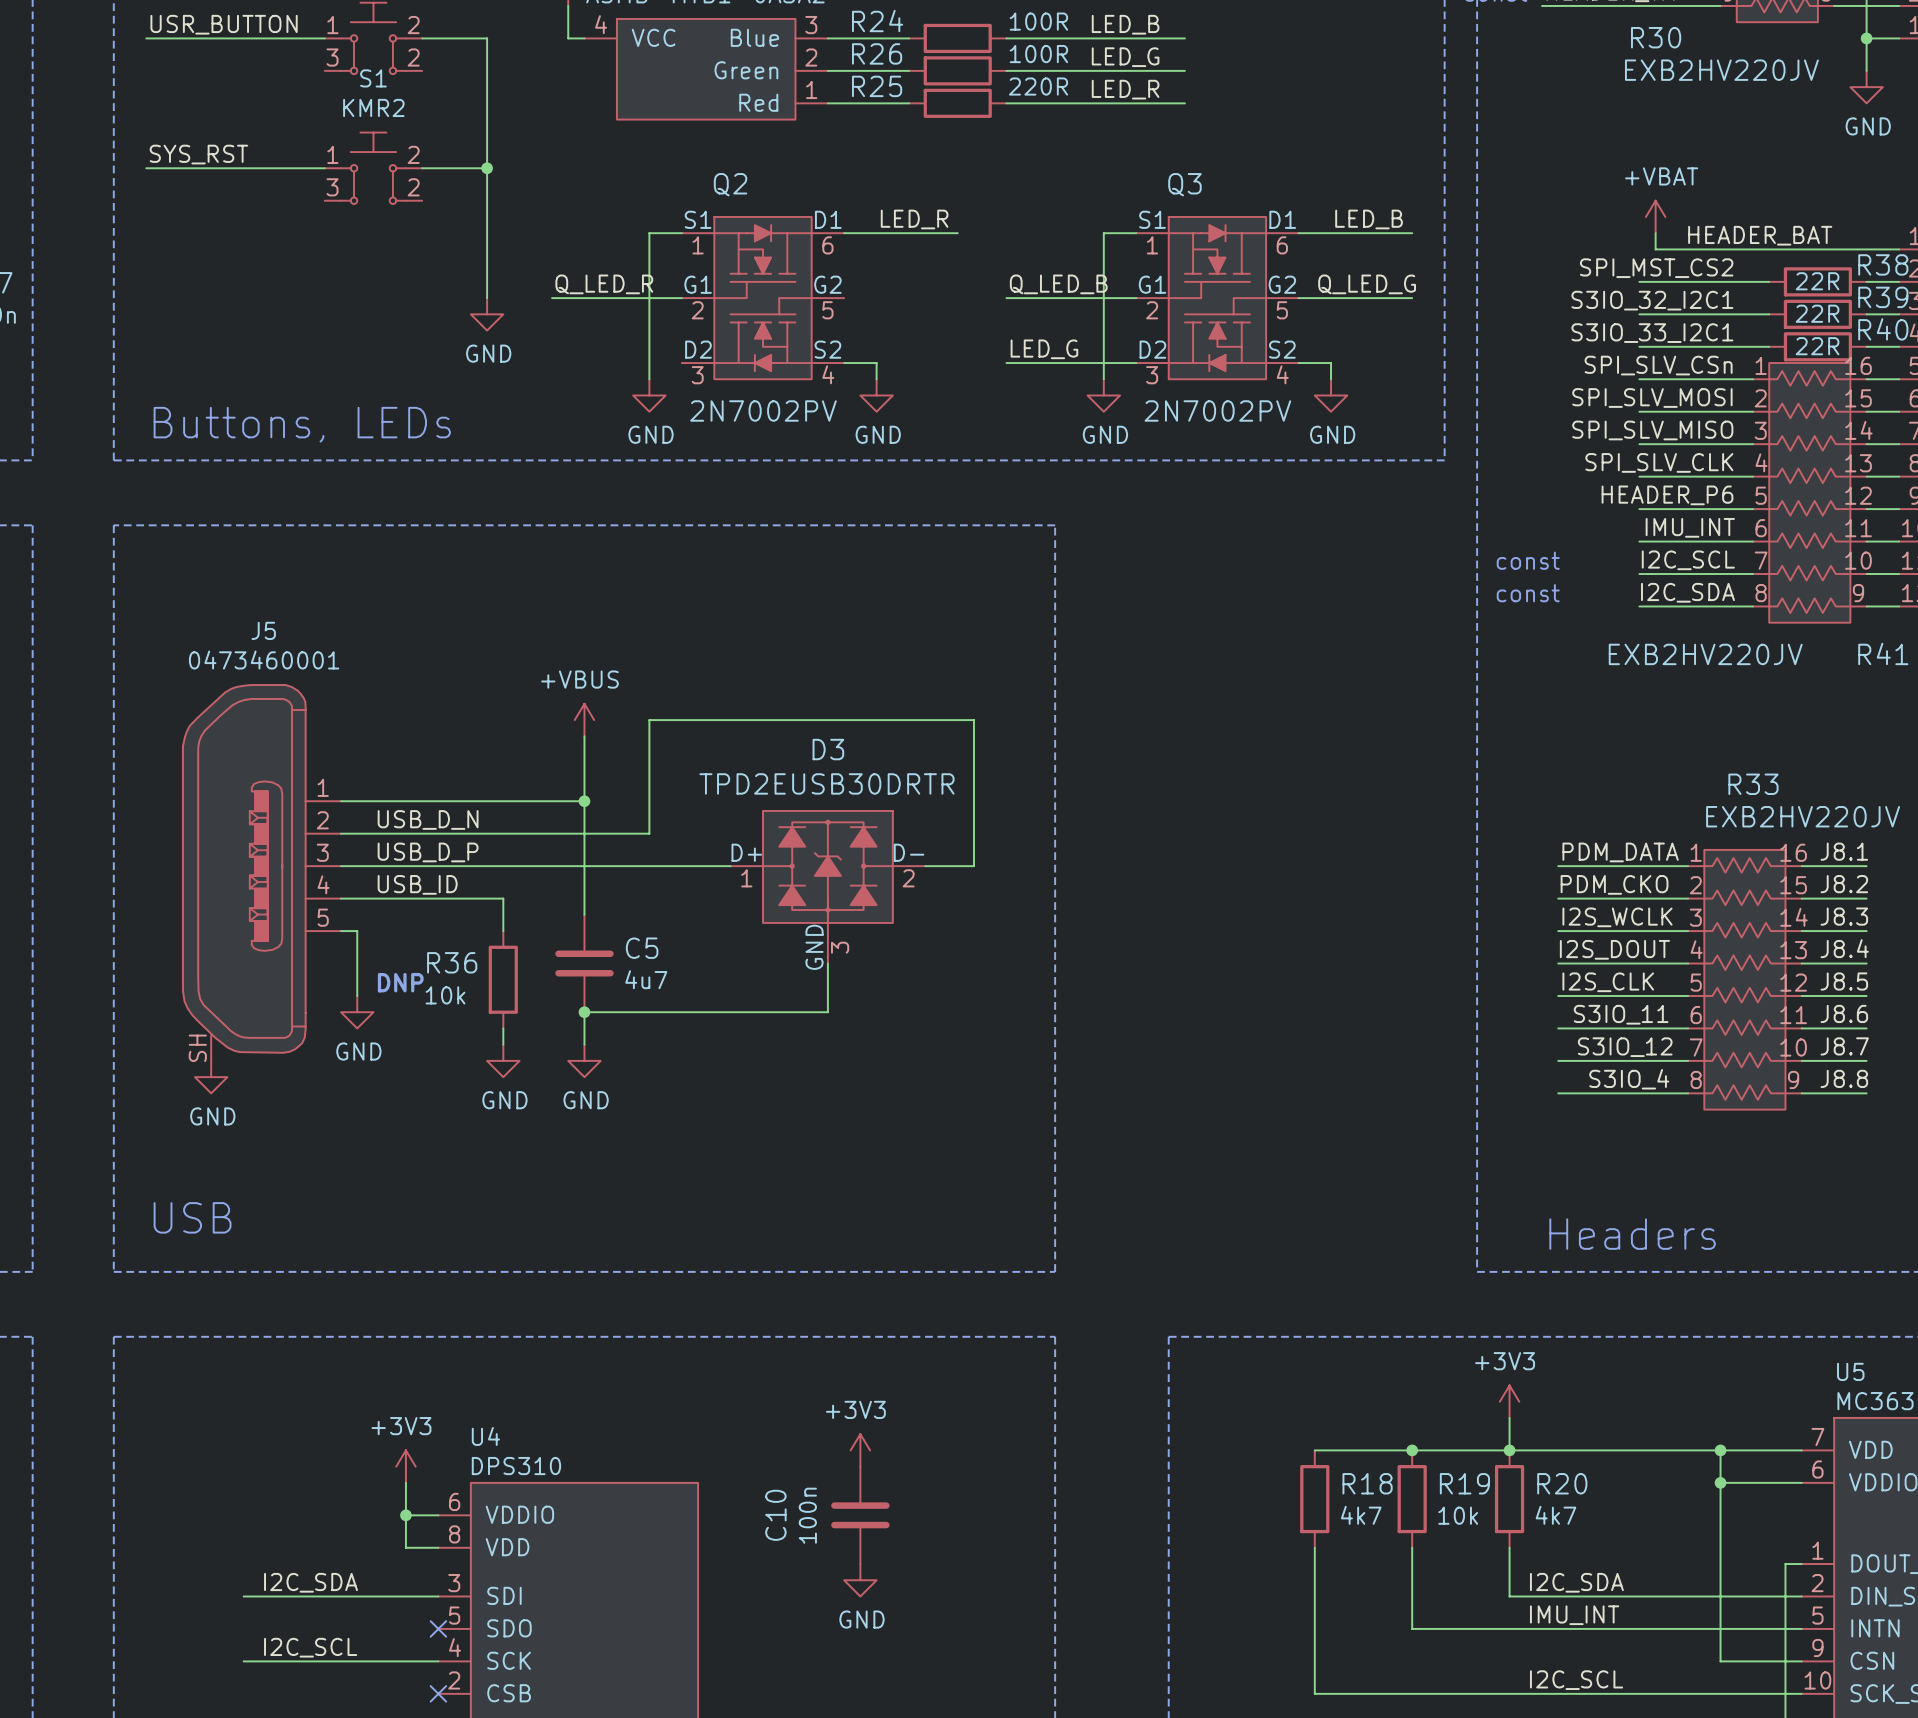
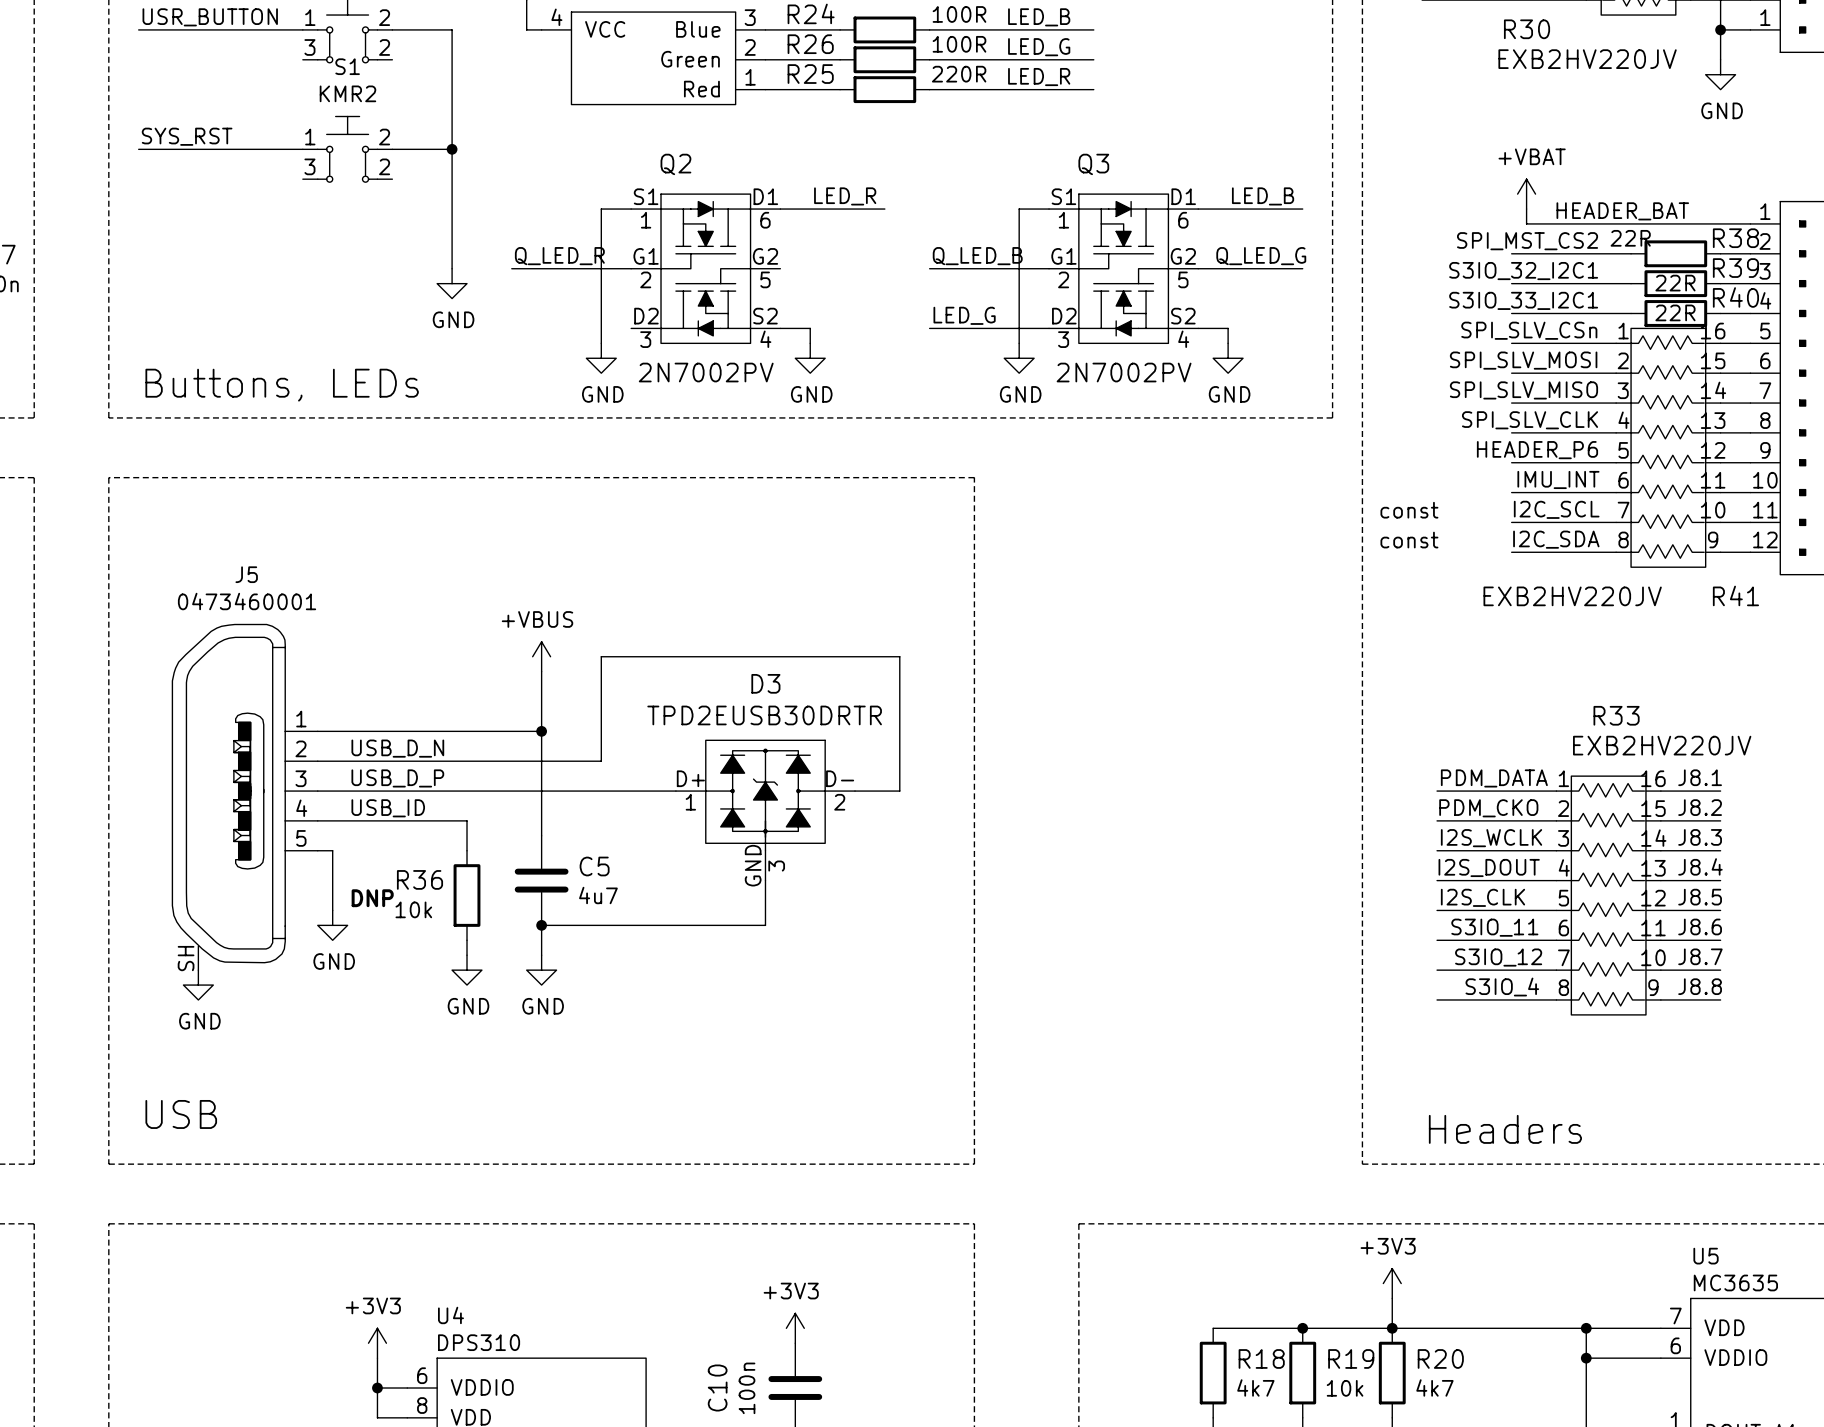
R38 text position: 22R (1817, 281) -> 22R (1630, 238)

